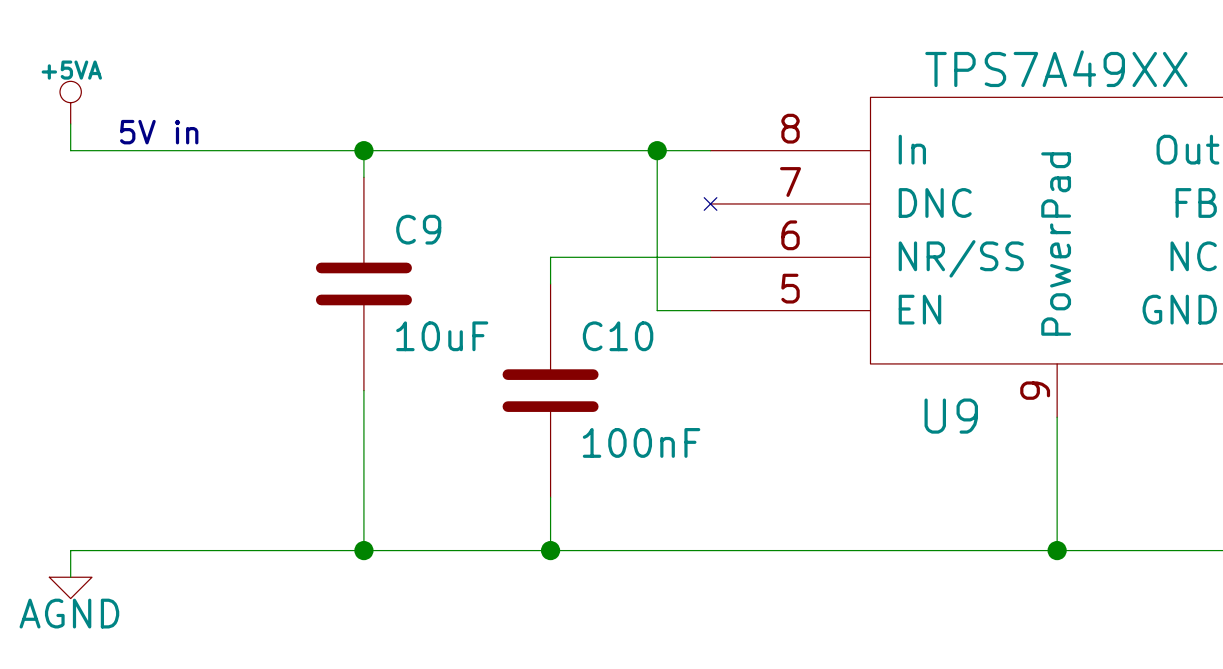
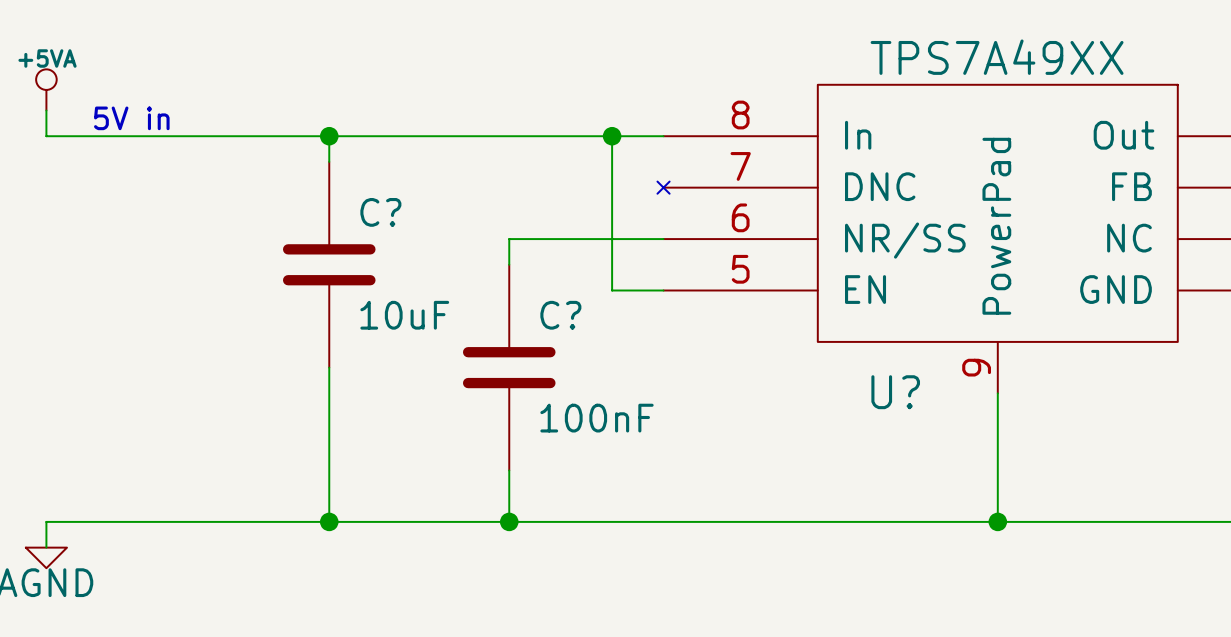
C9 name: C9 (418, 229) -> C? (380, 212)
C10 name: C10 (618, 336) -> C? (560, 315)
U9 name: U9 (951, 416) -> U? (895, 392)

